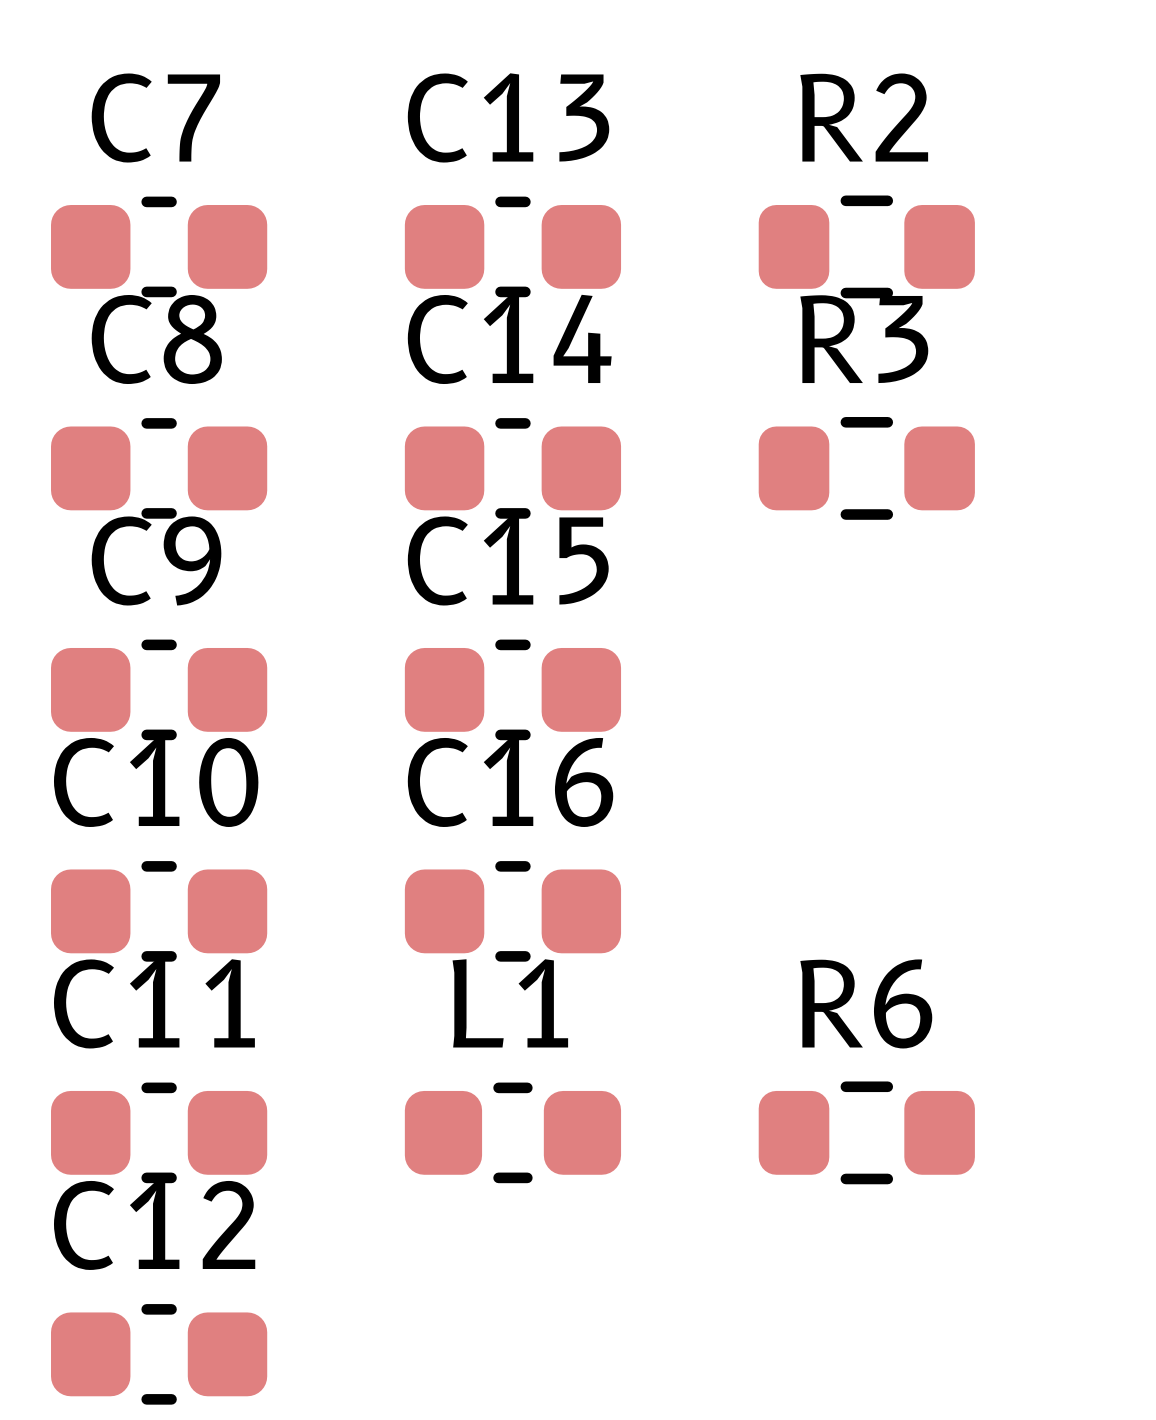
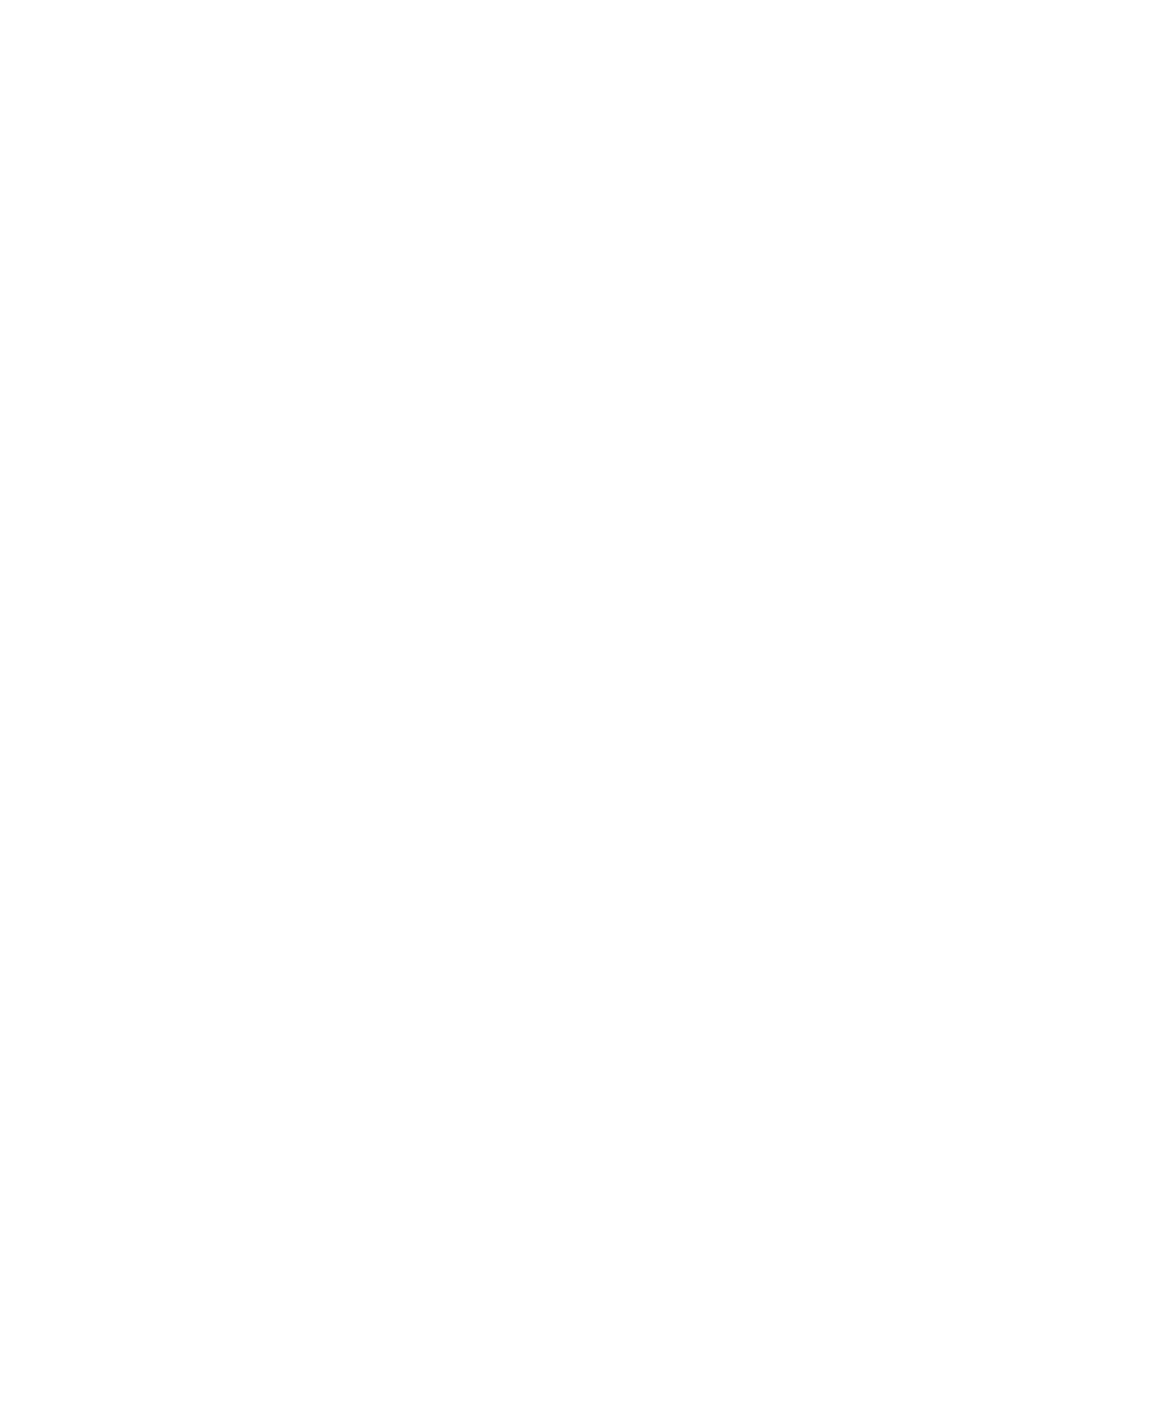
C7: (159, 246) -> none
C13: (512, 246) -> none
R2: (866, 246) -> none
C8: (159, 468) -> none
C14: (512, 468) -> none
R3: (866, 468) -> none
C9: (159, 689) -> none
C15: (512, 689) -> none
C10: (159, 911) -> none
C16: (512, 911) -> none
C11: (159, 1132) -> none
L1: (512, 1132) -> none
R6: (866, 1132) -> none
C12: (159, 1354) -> none

